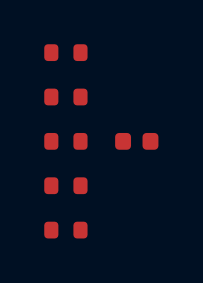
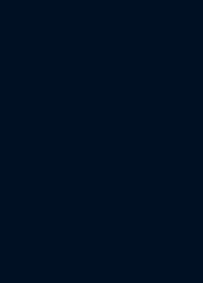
part: (65, 52) -> none
part: (65, 97) -> none
part: (65, 141) -> none
part: (136, 141) -> none
part: (65, 185) -> none
part: (65, 230) -> none

